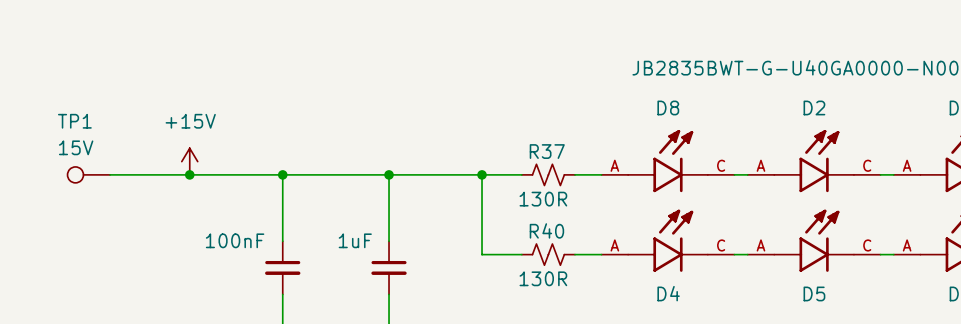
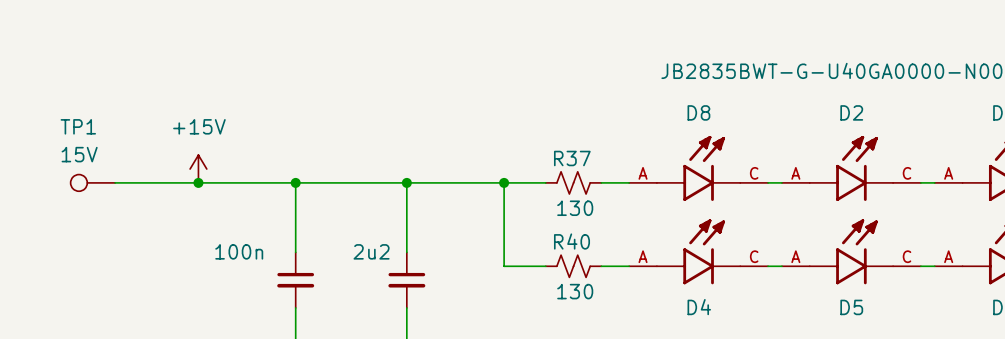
R37 value: 130R (543, 199) -> 130 (575, 208)
part value: 100nF (235, 240) -> 100n (239, 251)
part value: 1uF (355, 240) -> 2u2 (371, 251)
R40 value: 130R (543, 278) -> 130 (575, 291)

